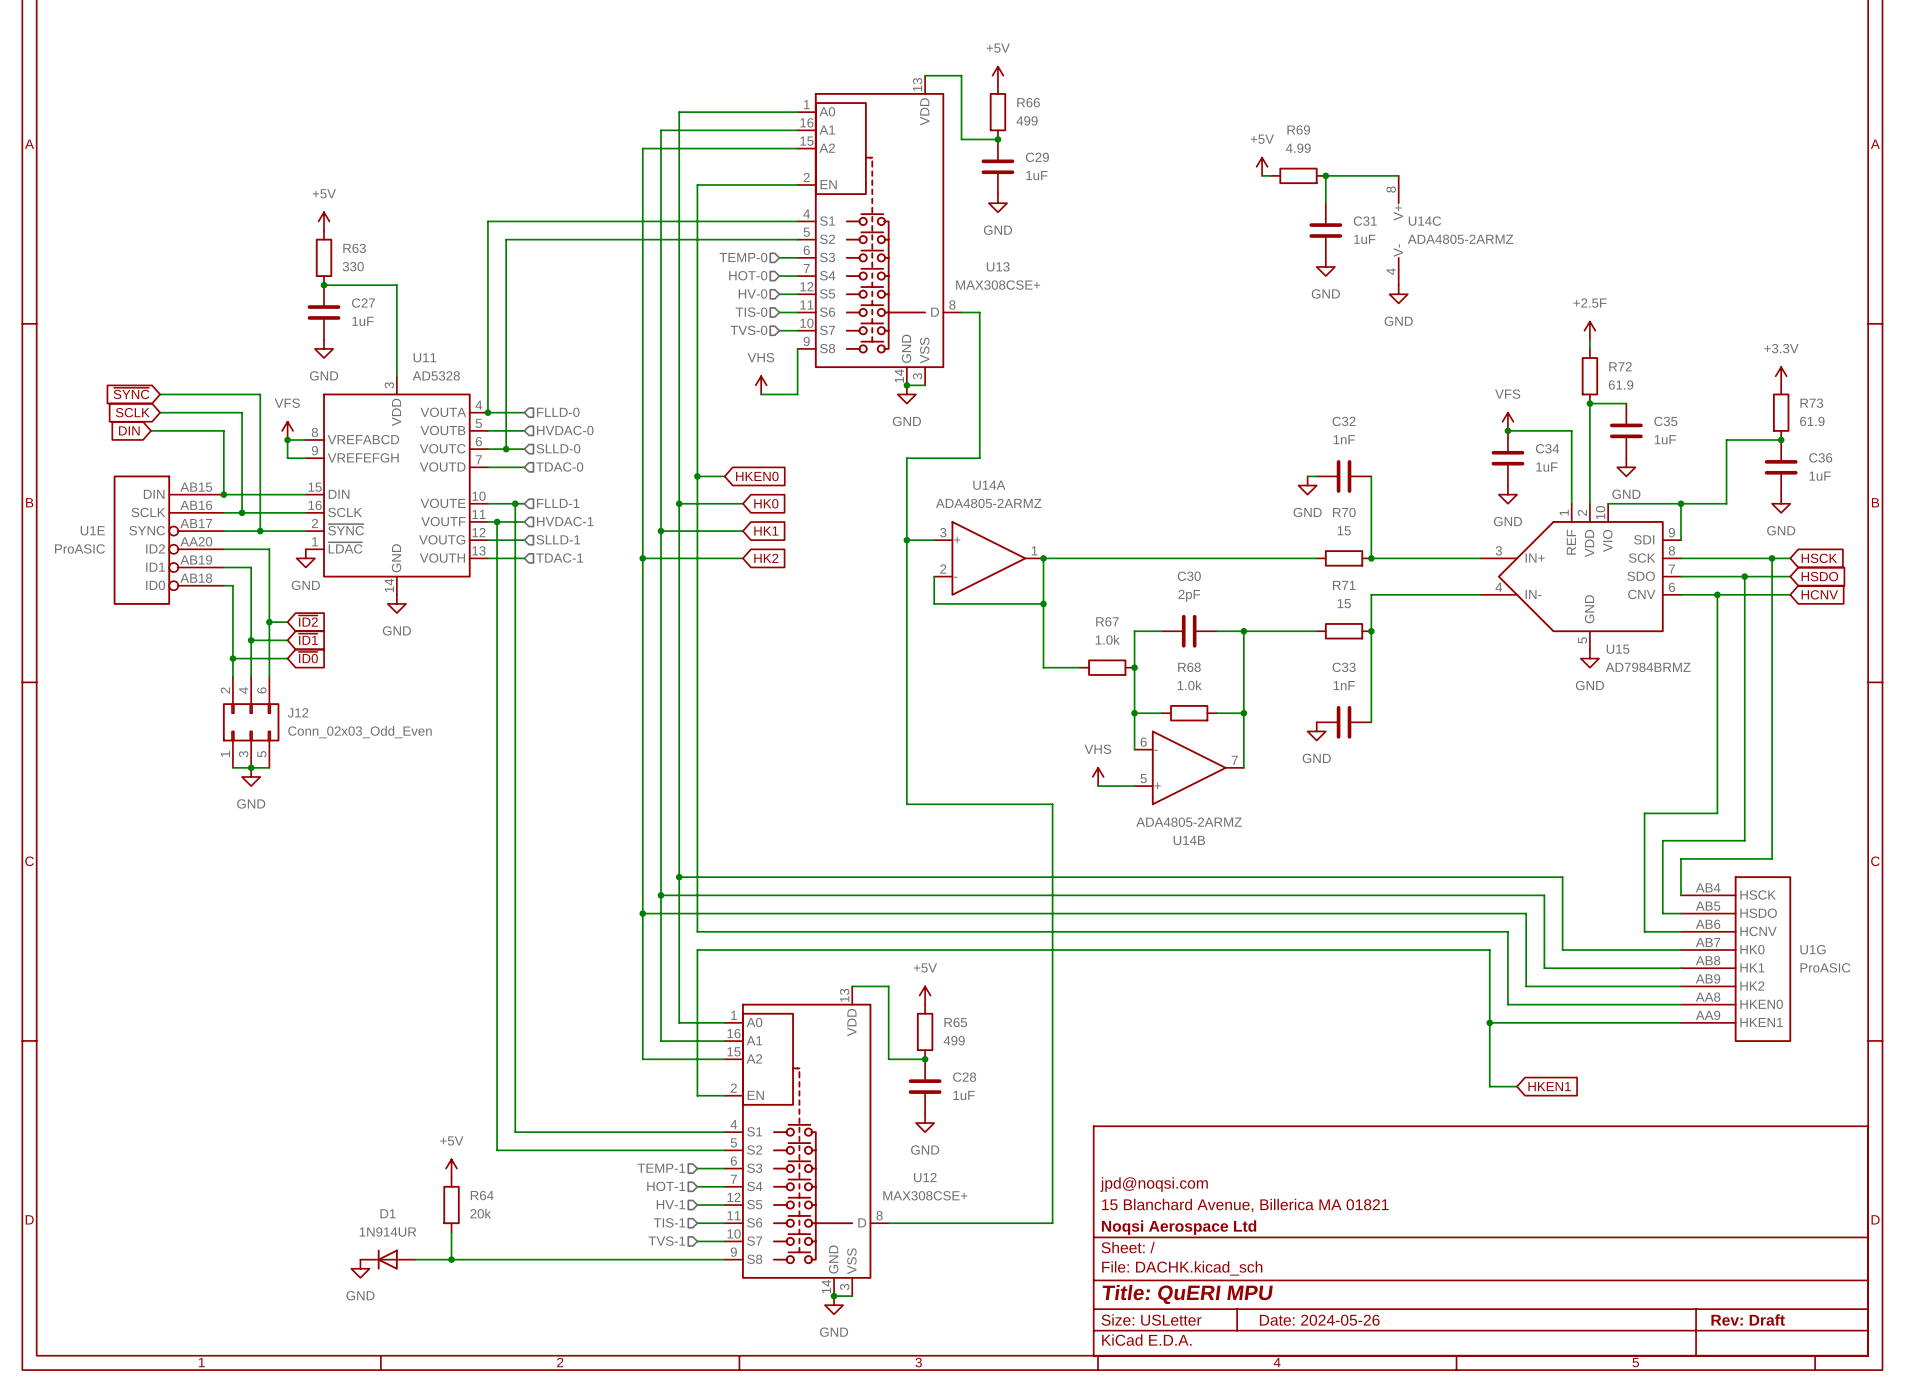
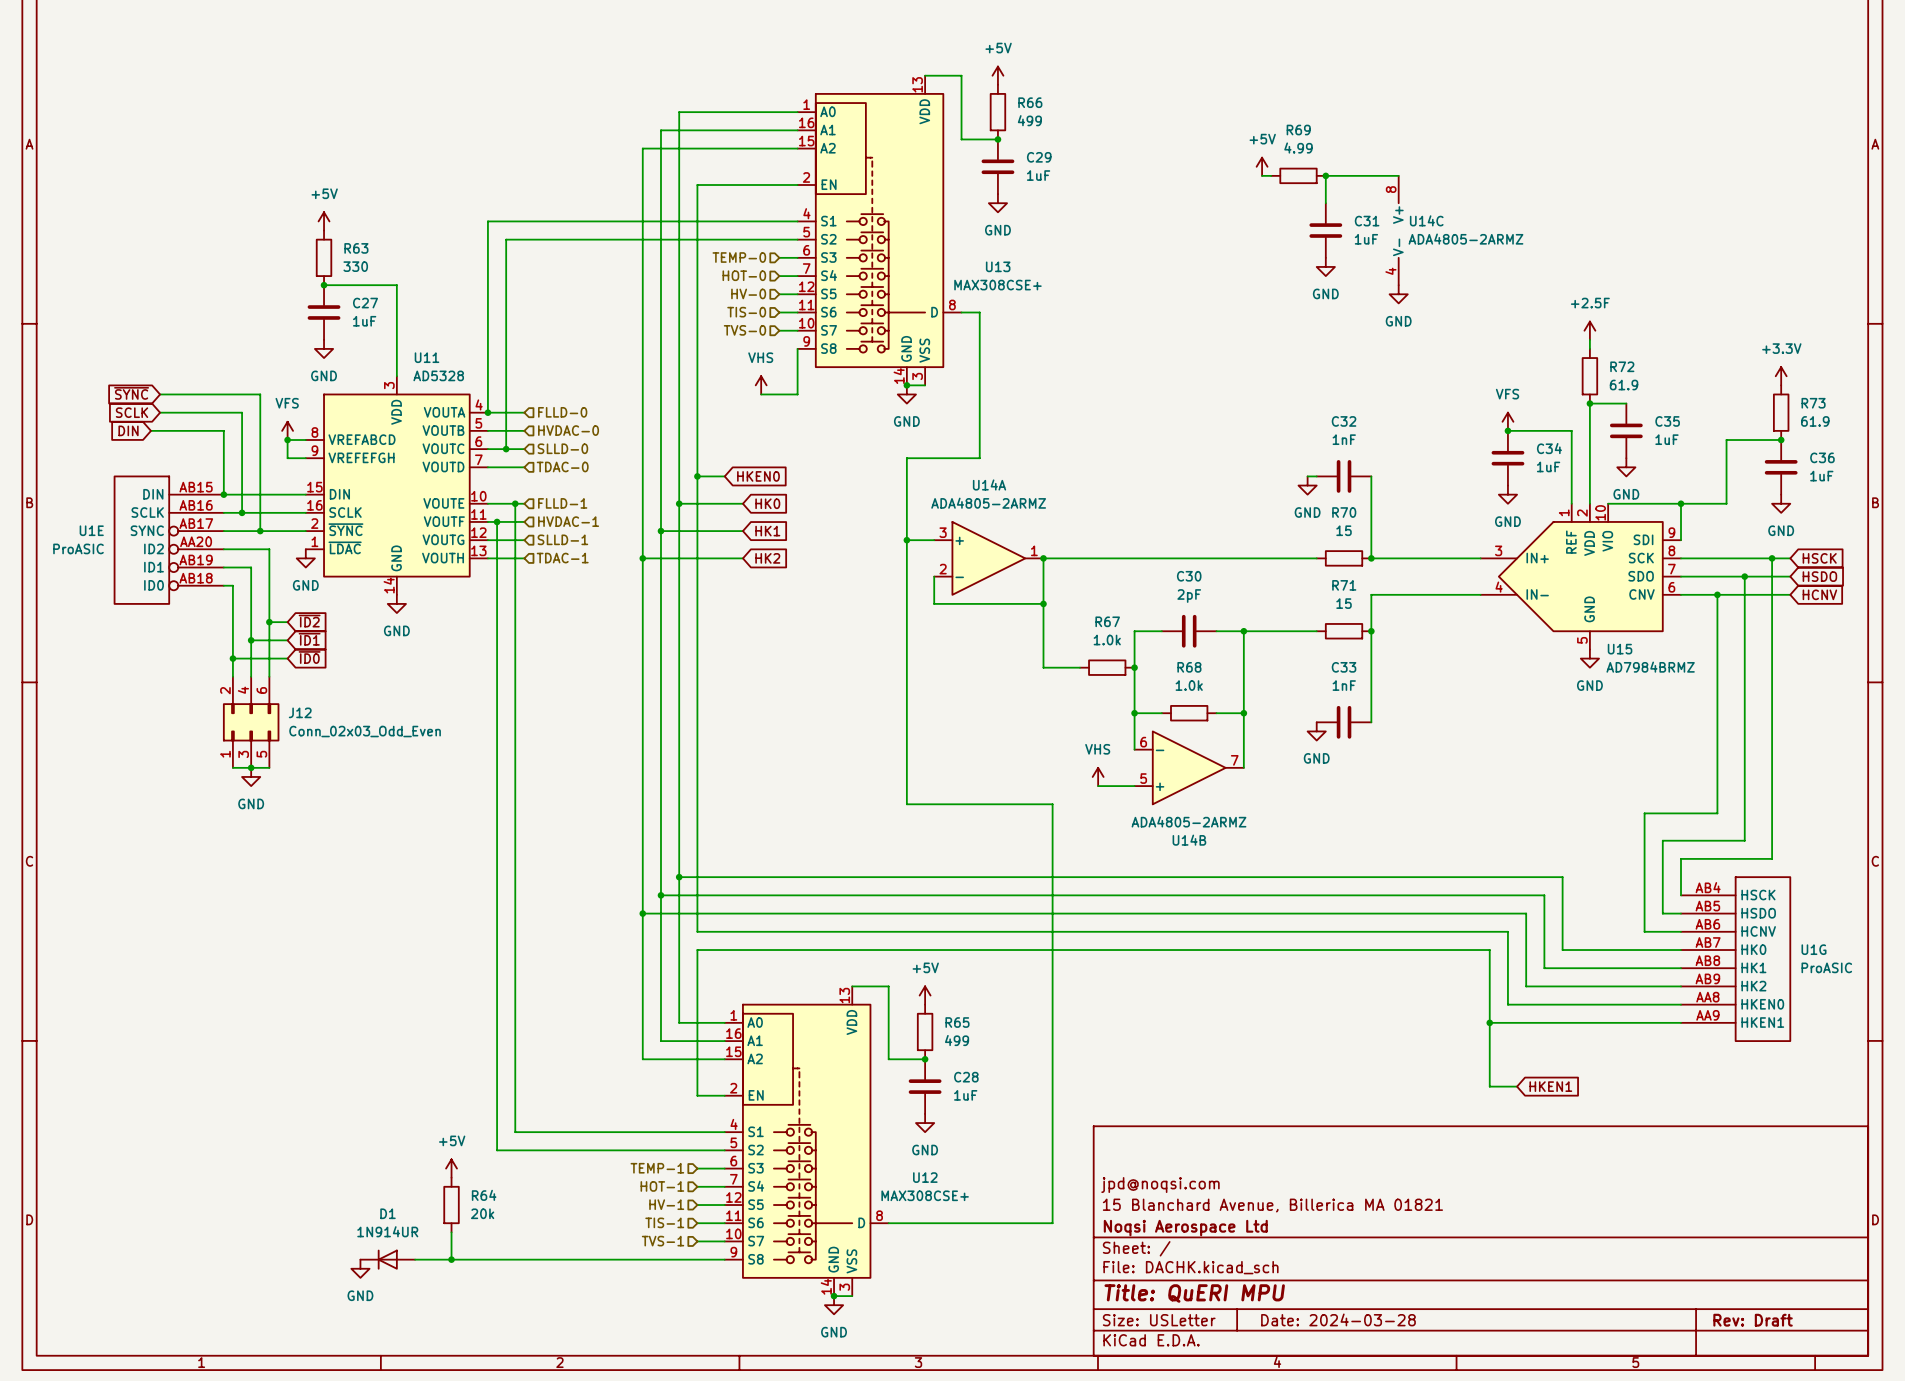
title block: Date: 2024-05-26 (1319, 1320) -> Date: 2024-03-28 (1338, 1319)

